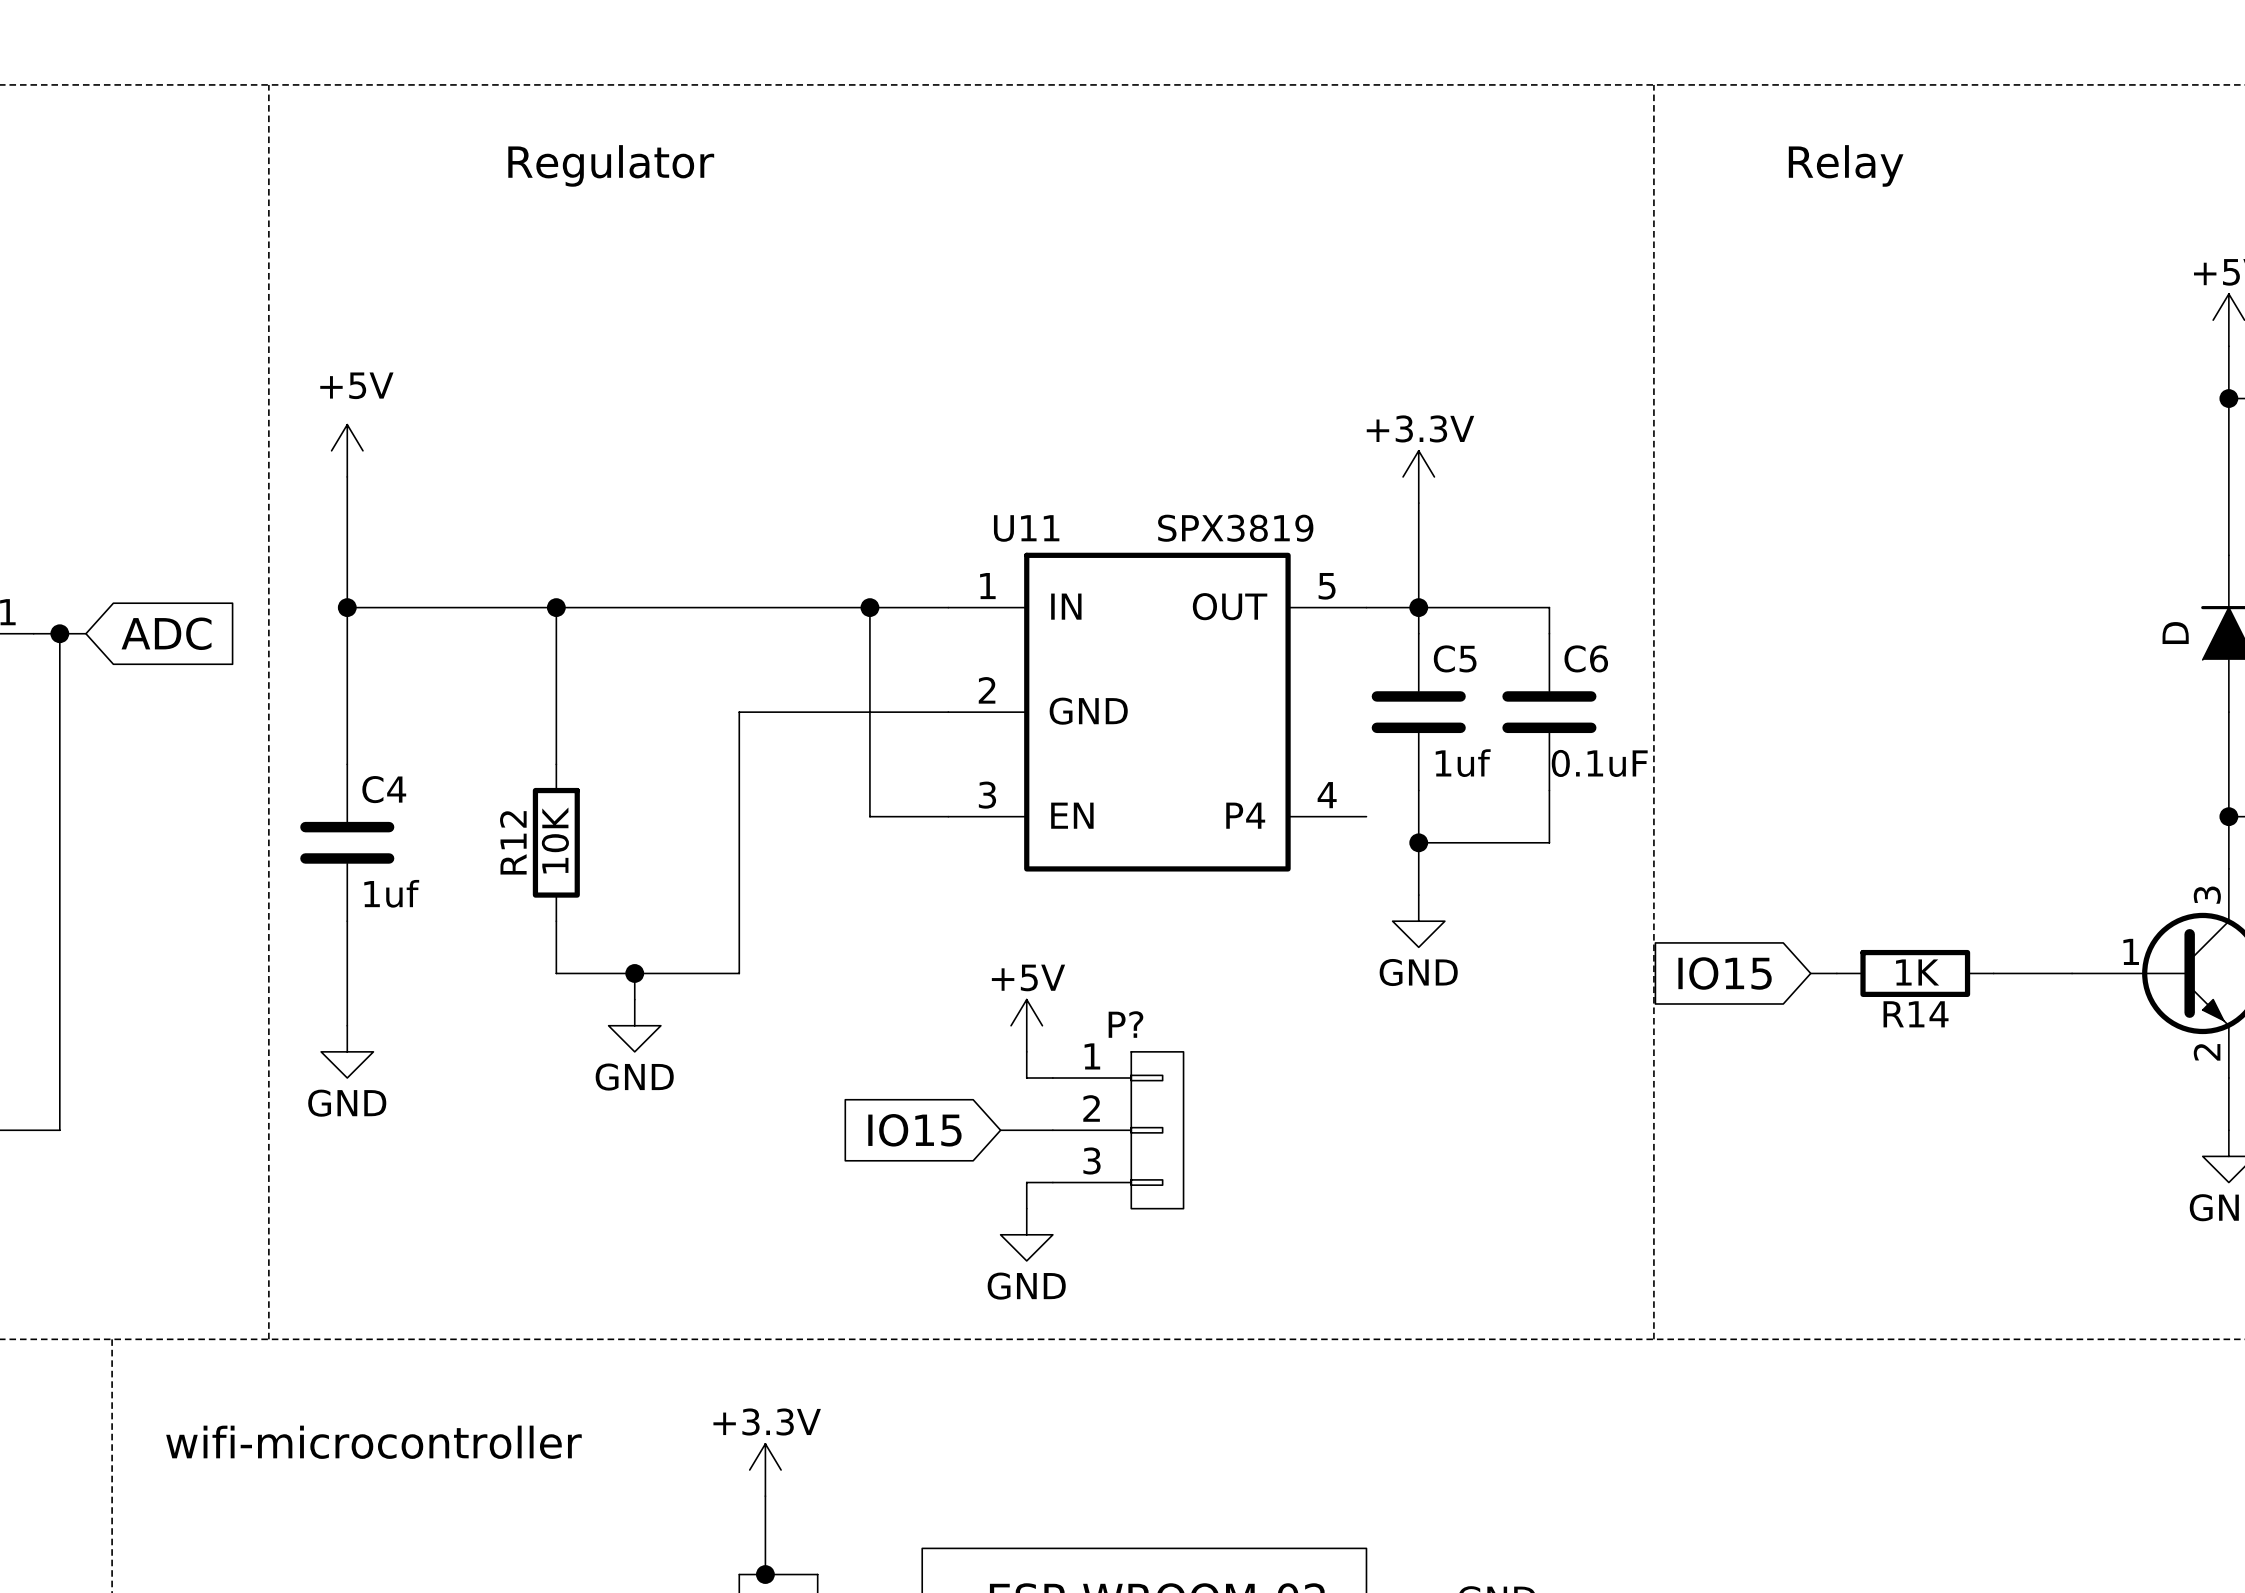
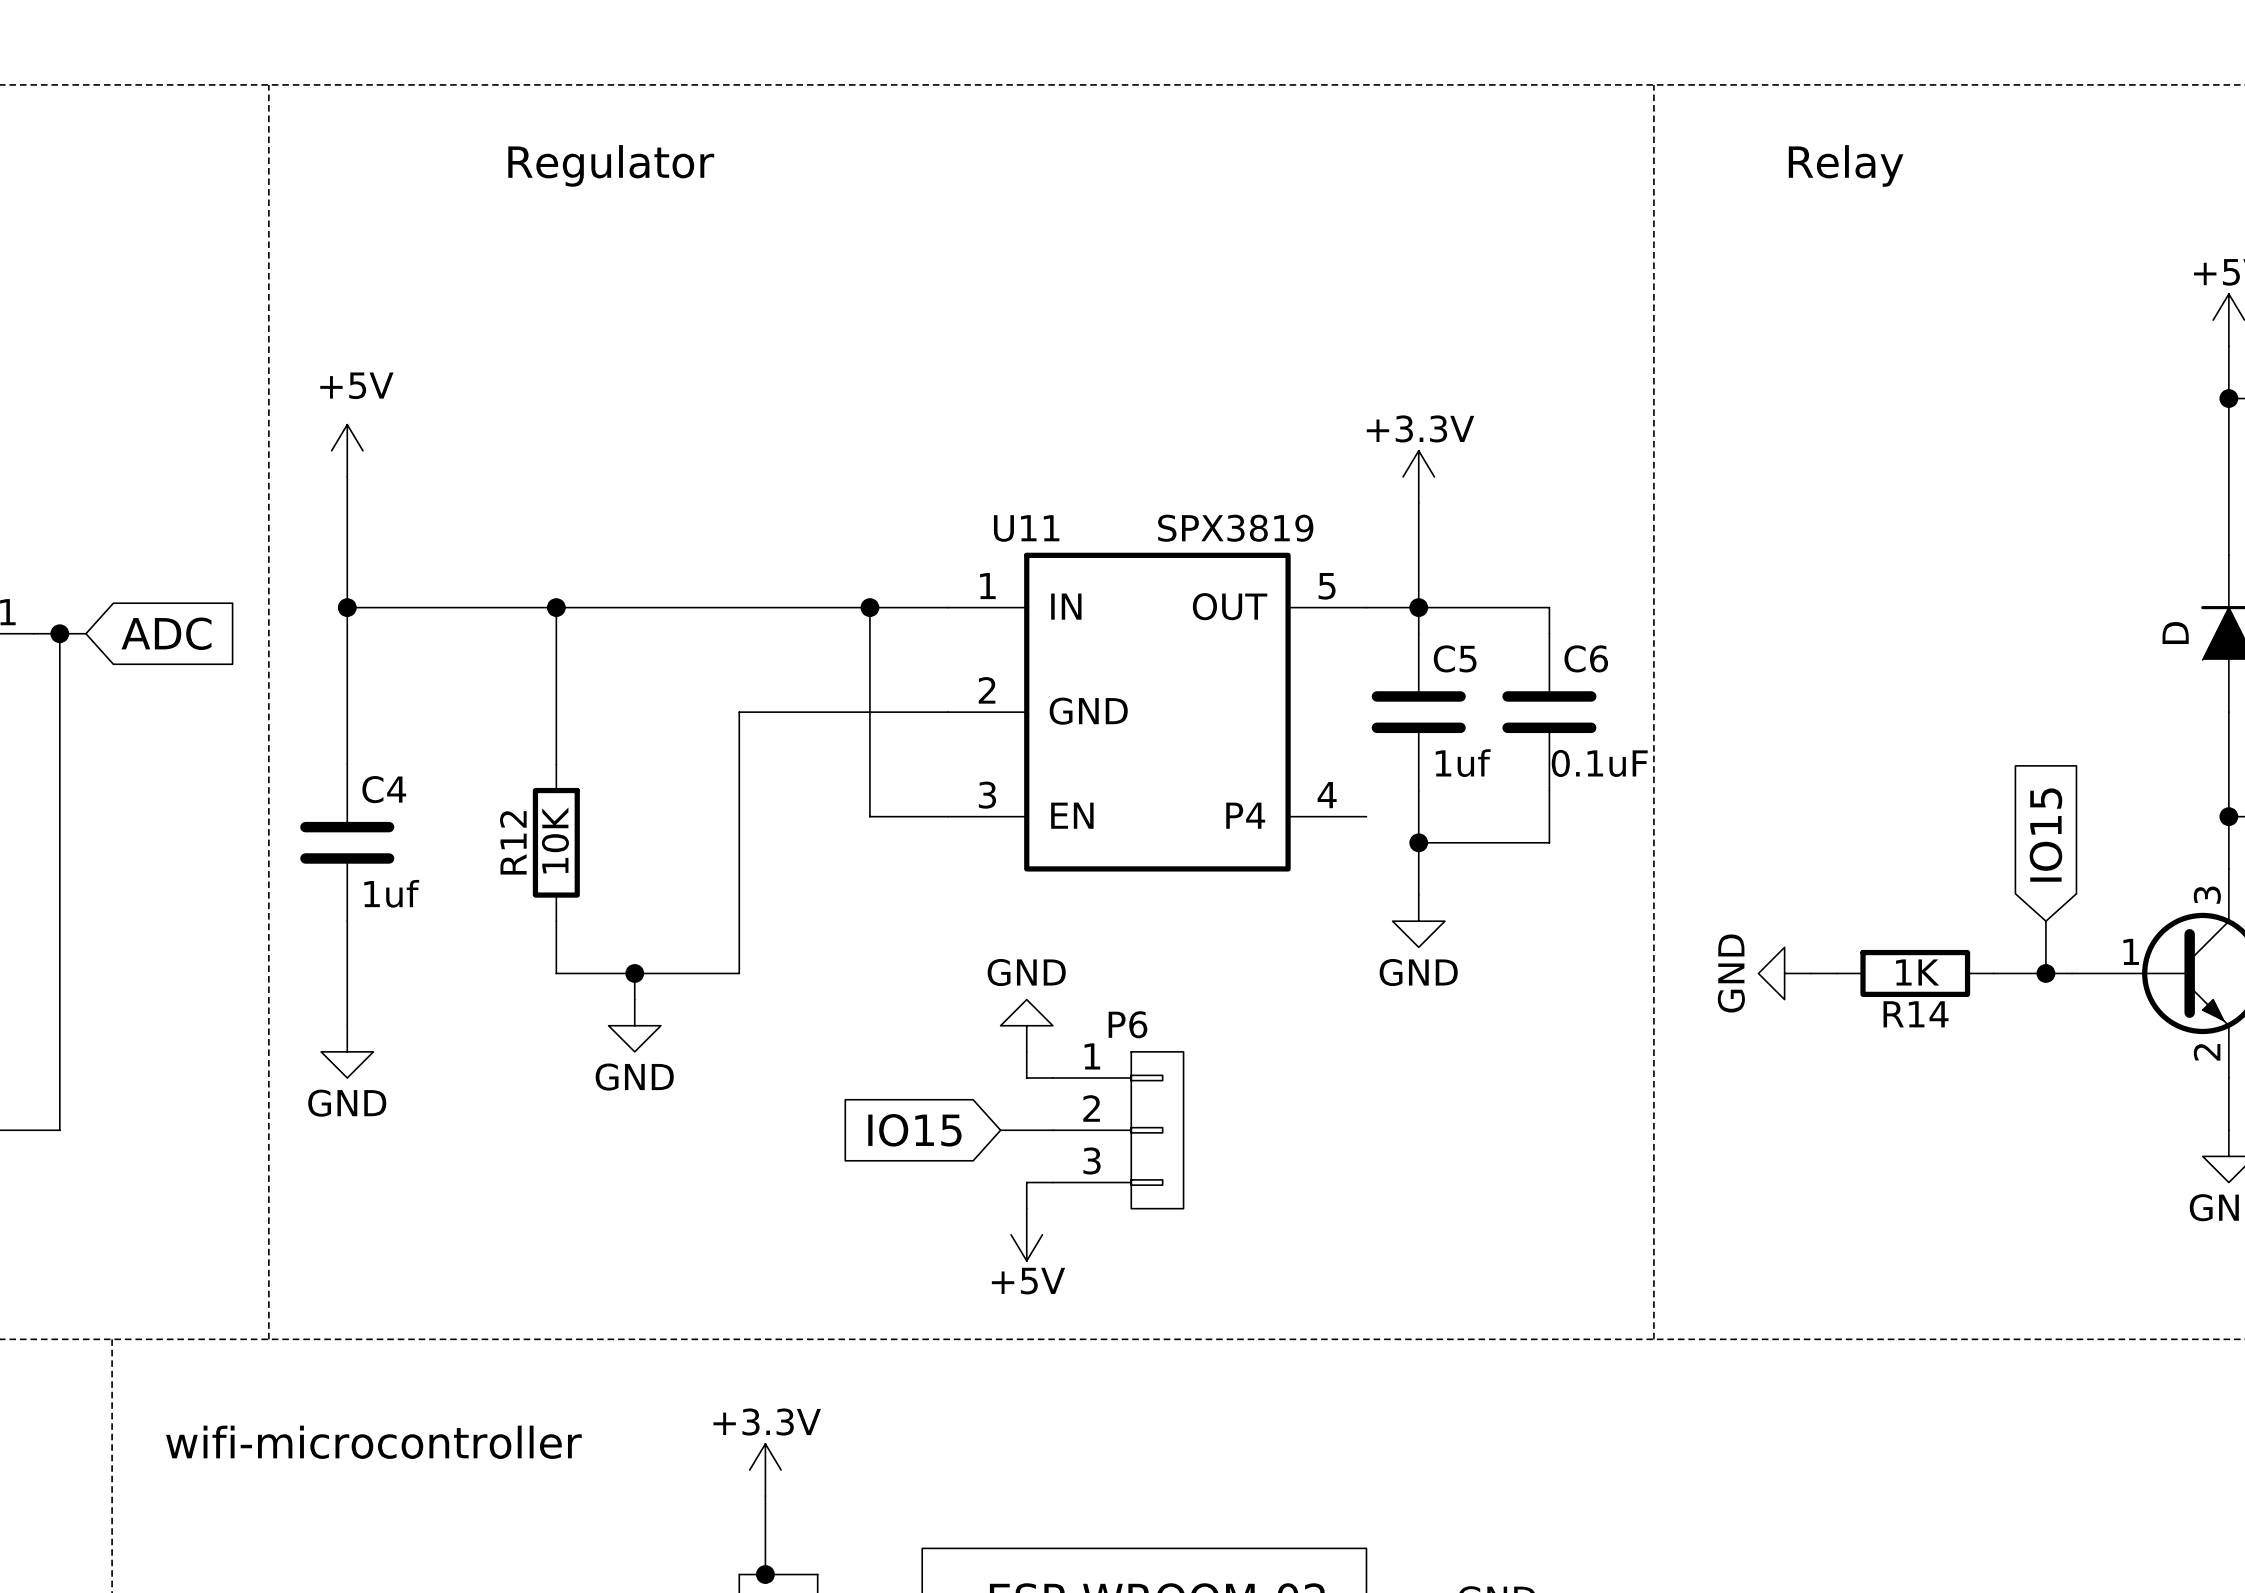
wire: none -> (2045, 921) (2045, 973)
global label rotation: 0° (1725, 973) -> 90° clockwise (2045, 835)
global label position: IO15 (1725, 973) -> IO15 (2045, 835)
power symbol: none -> GND (1784, 973)
junction: none -> (2045, 973)
P? name: P? (1125, 1024) -> P6 (1127, 1024)
power symbol: +5V (1026, 1025) -> GND (1026, 1025)
power symbol: GND (1026, 1234) -> +5V (1026, 1234)

